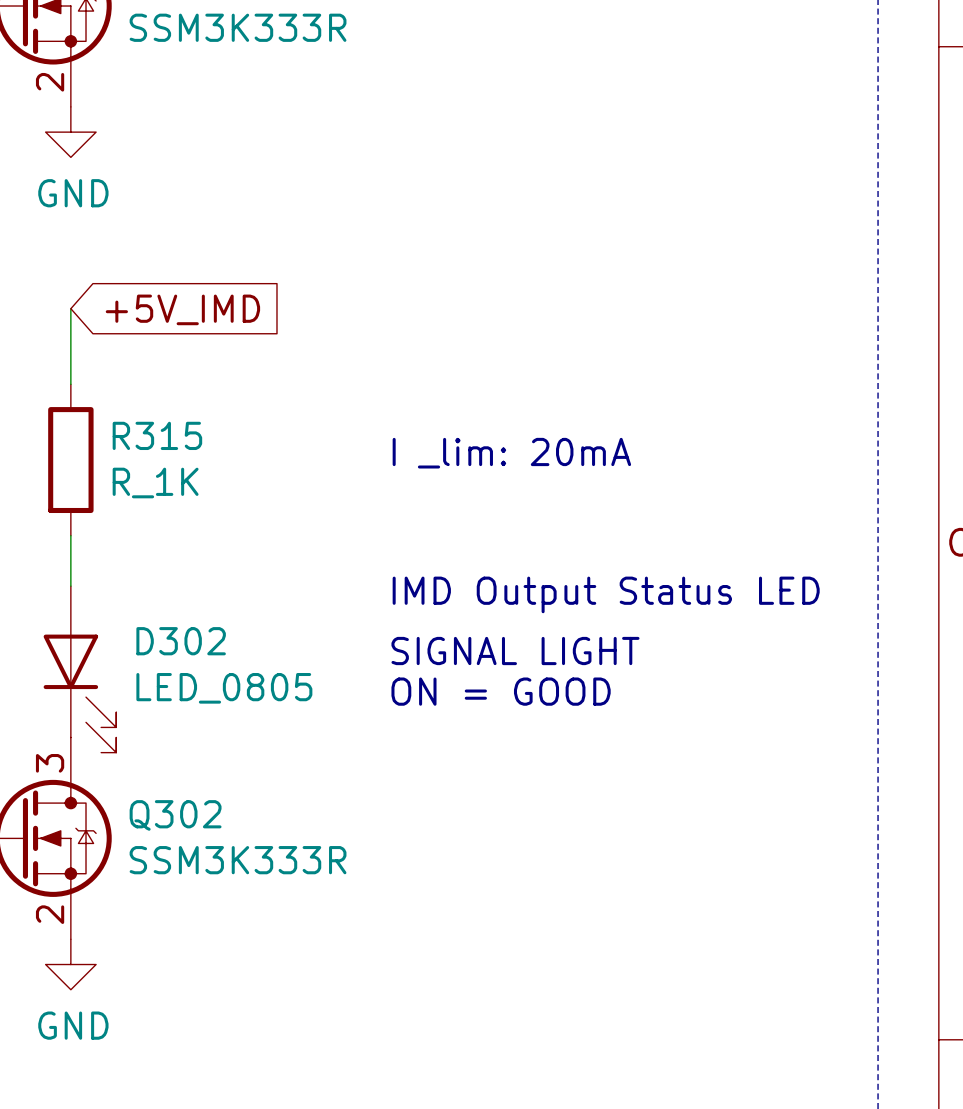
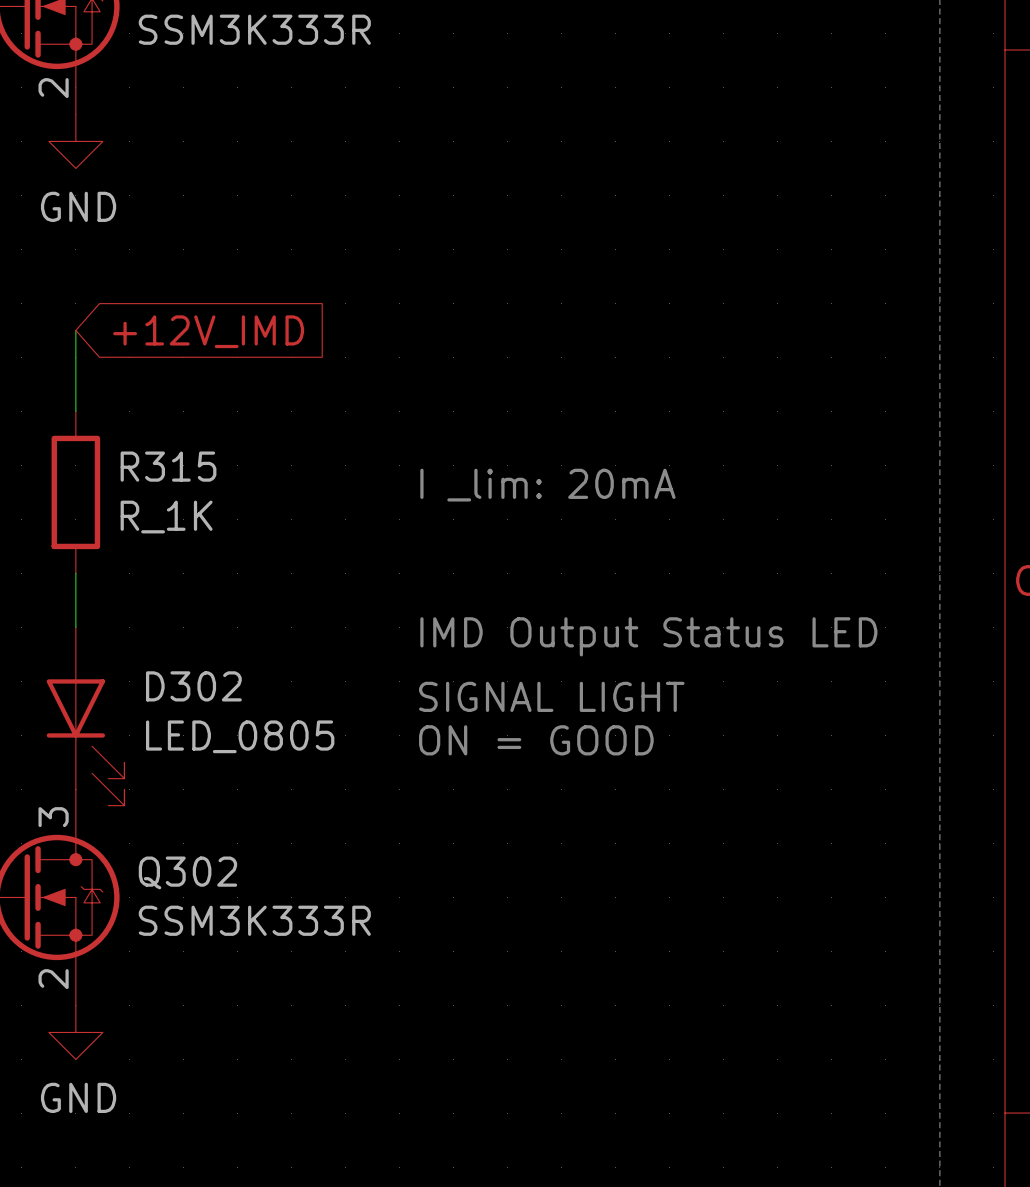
global label: +5V_IMD (182, 309) -> +12V_IMD (208, 331)

